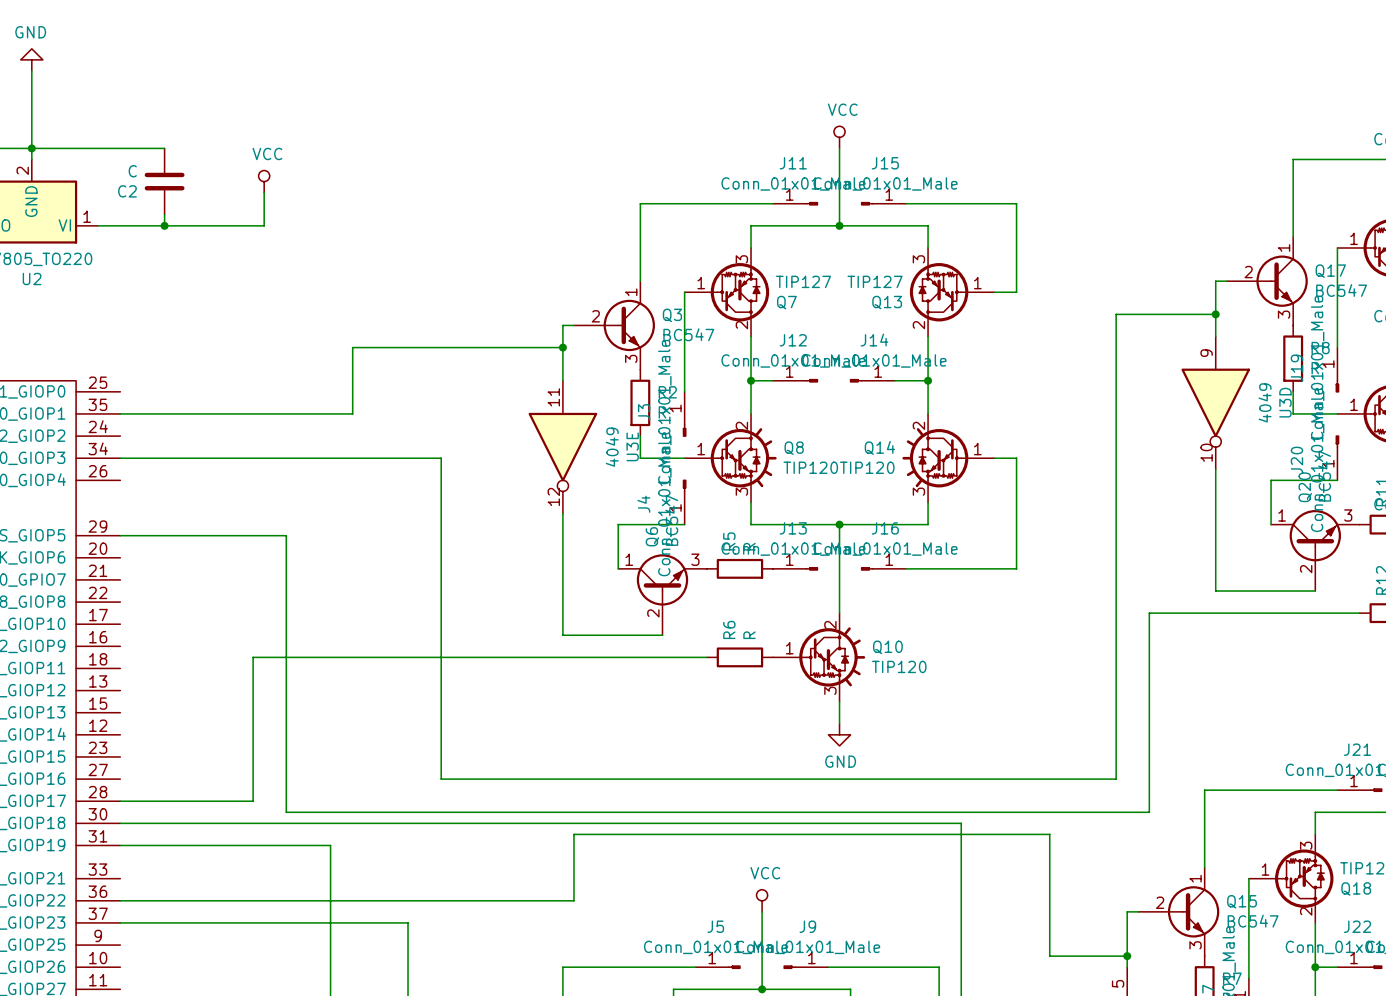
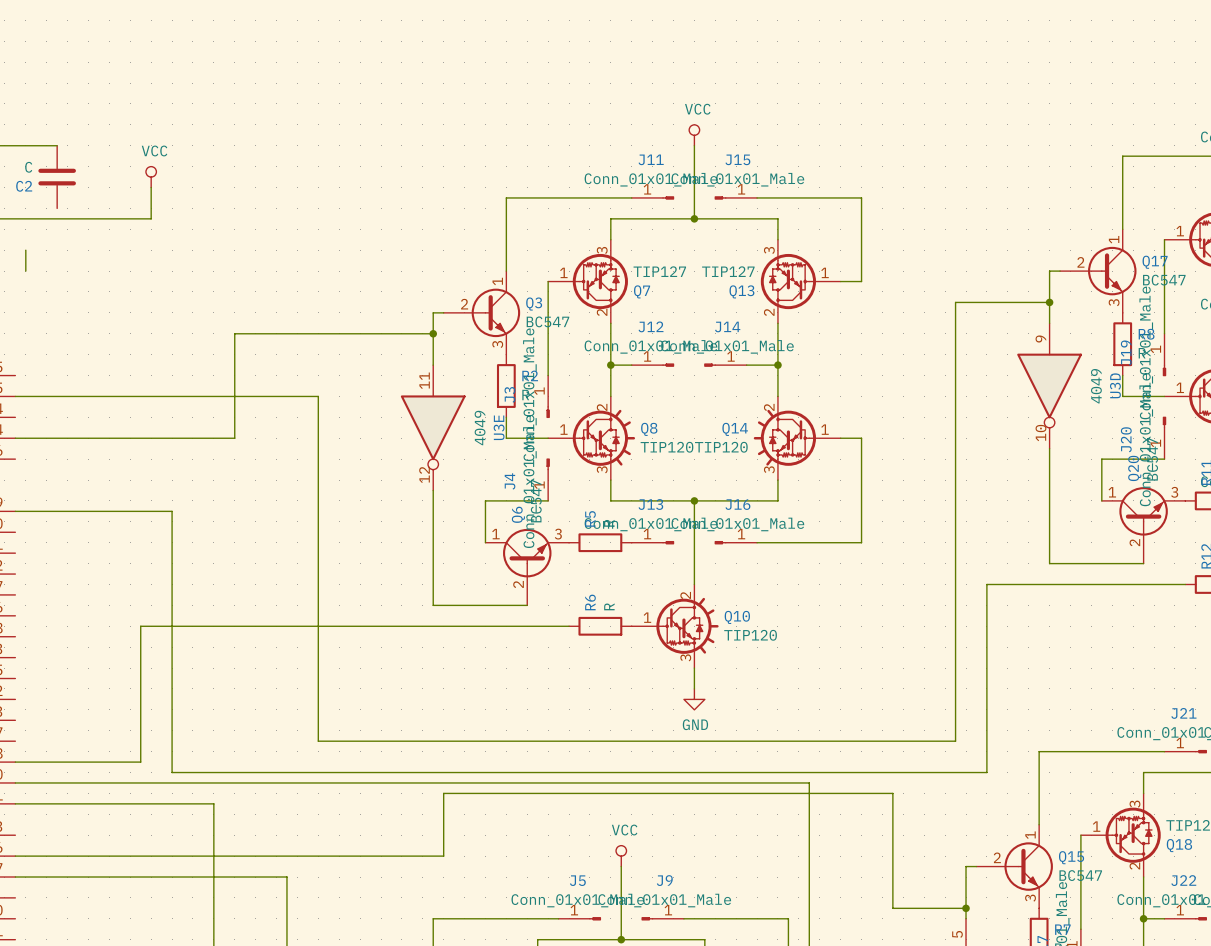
wire: (164, 214) (164, 225) -> none
junction: (164, 225) -> none
wire: none -> (25, 250) (25, 271)
wire: (352, 458) (441, 458) -> (234, 438) (234, 396) (318, 396) (318, 438)

